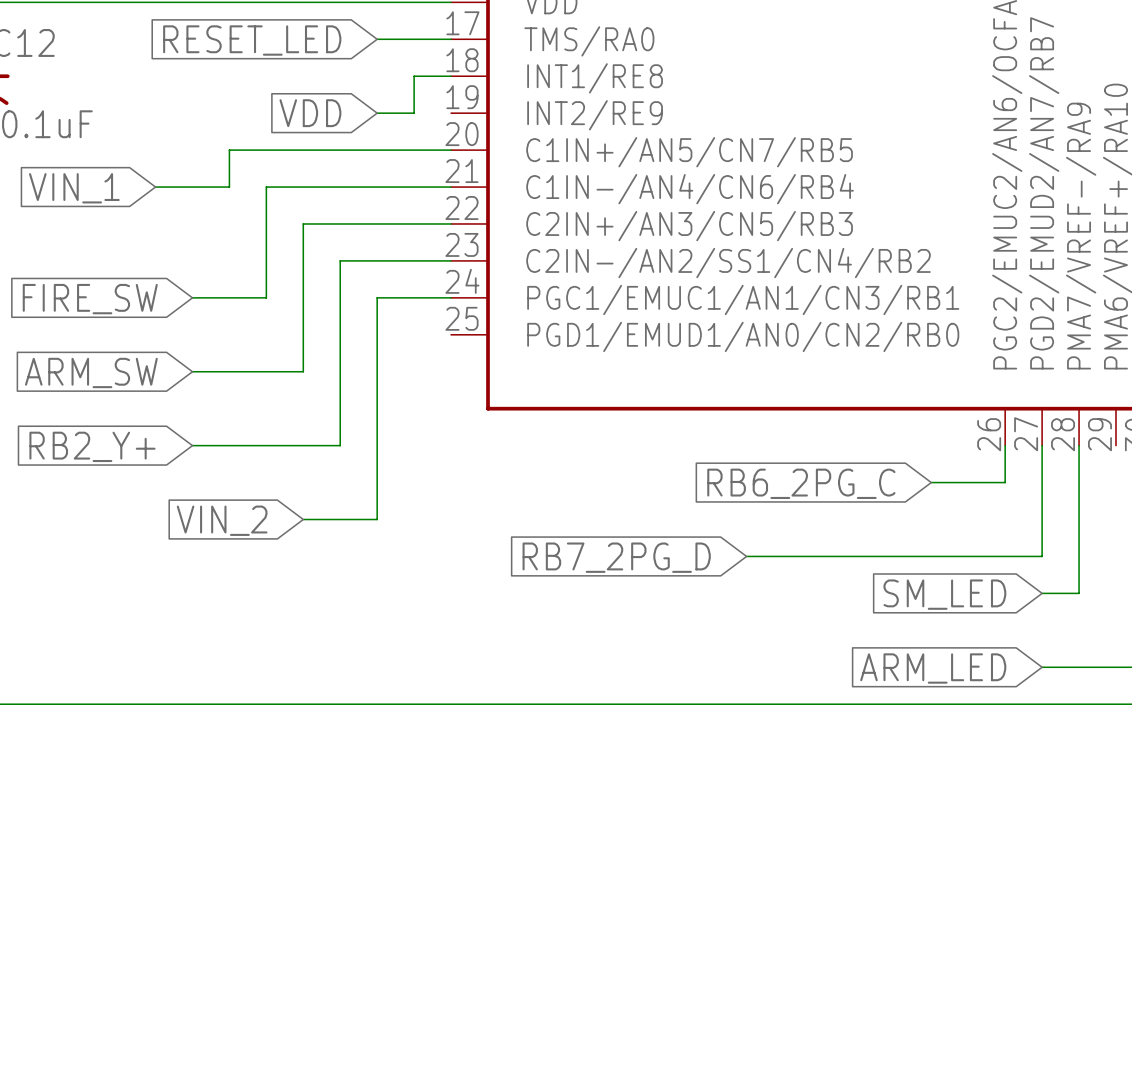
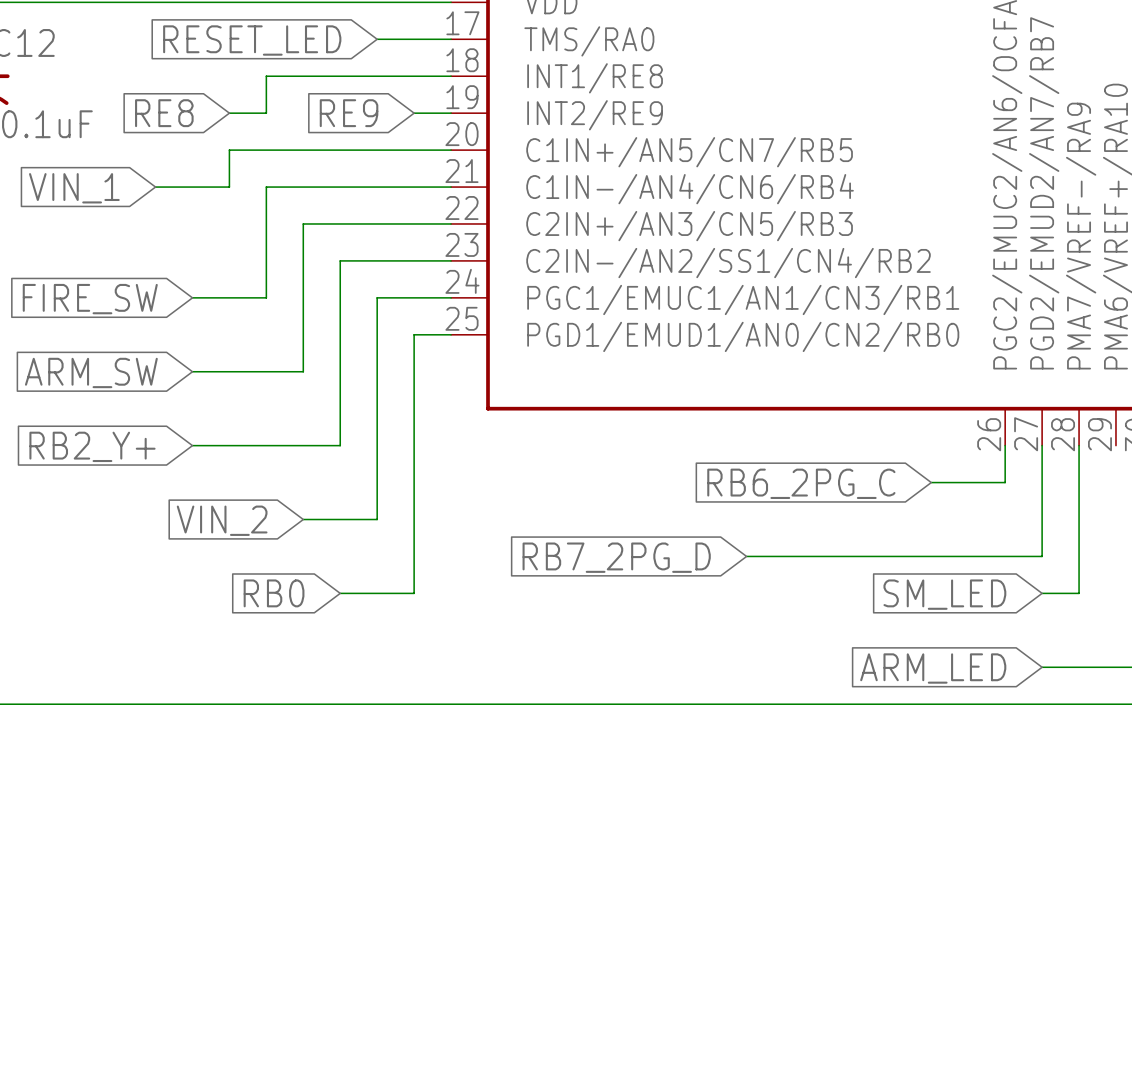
wire: (414, 76) (414, 113) (377, 113) -> (414, 76) (266, 76) (266, 113) (229, 113)
global label: none -> RE8 (164, 113)
global label: VDD (310, 113) -> none
global label: none -> RE9 (349, 113)
wire: none -> (414, 113) (451, 113)
wire: none -> (451, 334) (414, 334) (414, 593) (340, 593)
global label: none -> RB0 (274, 593)

